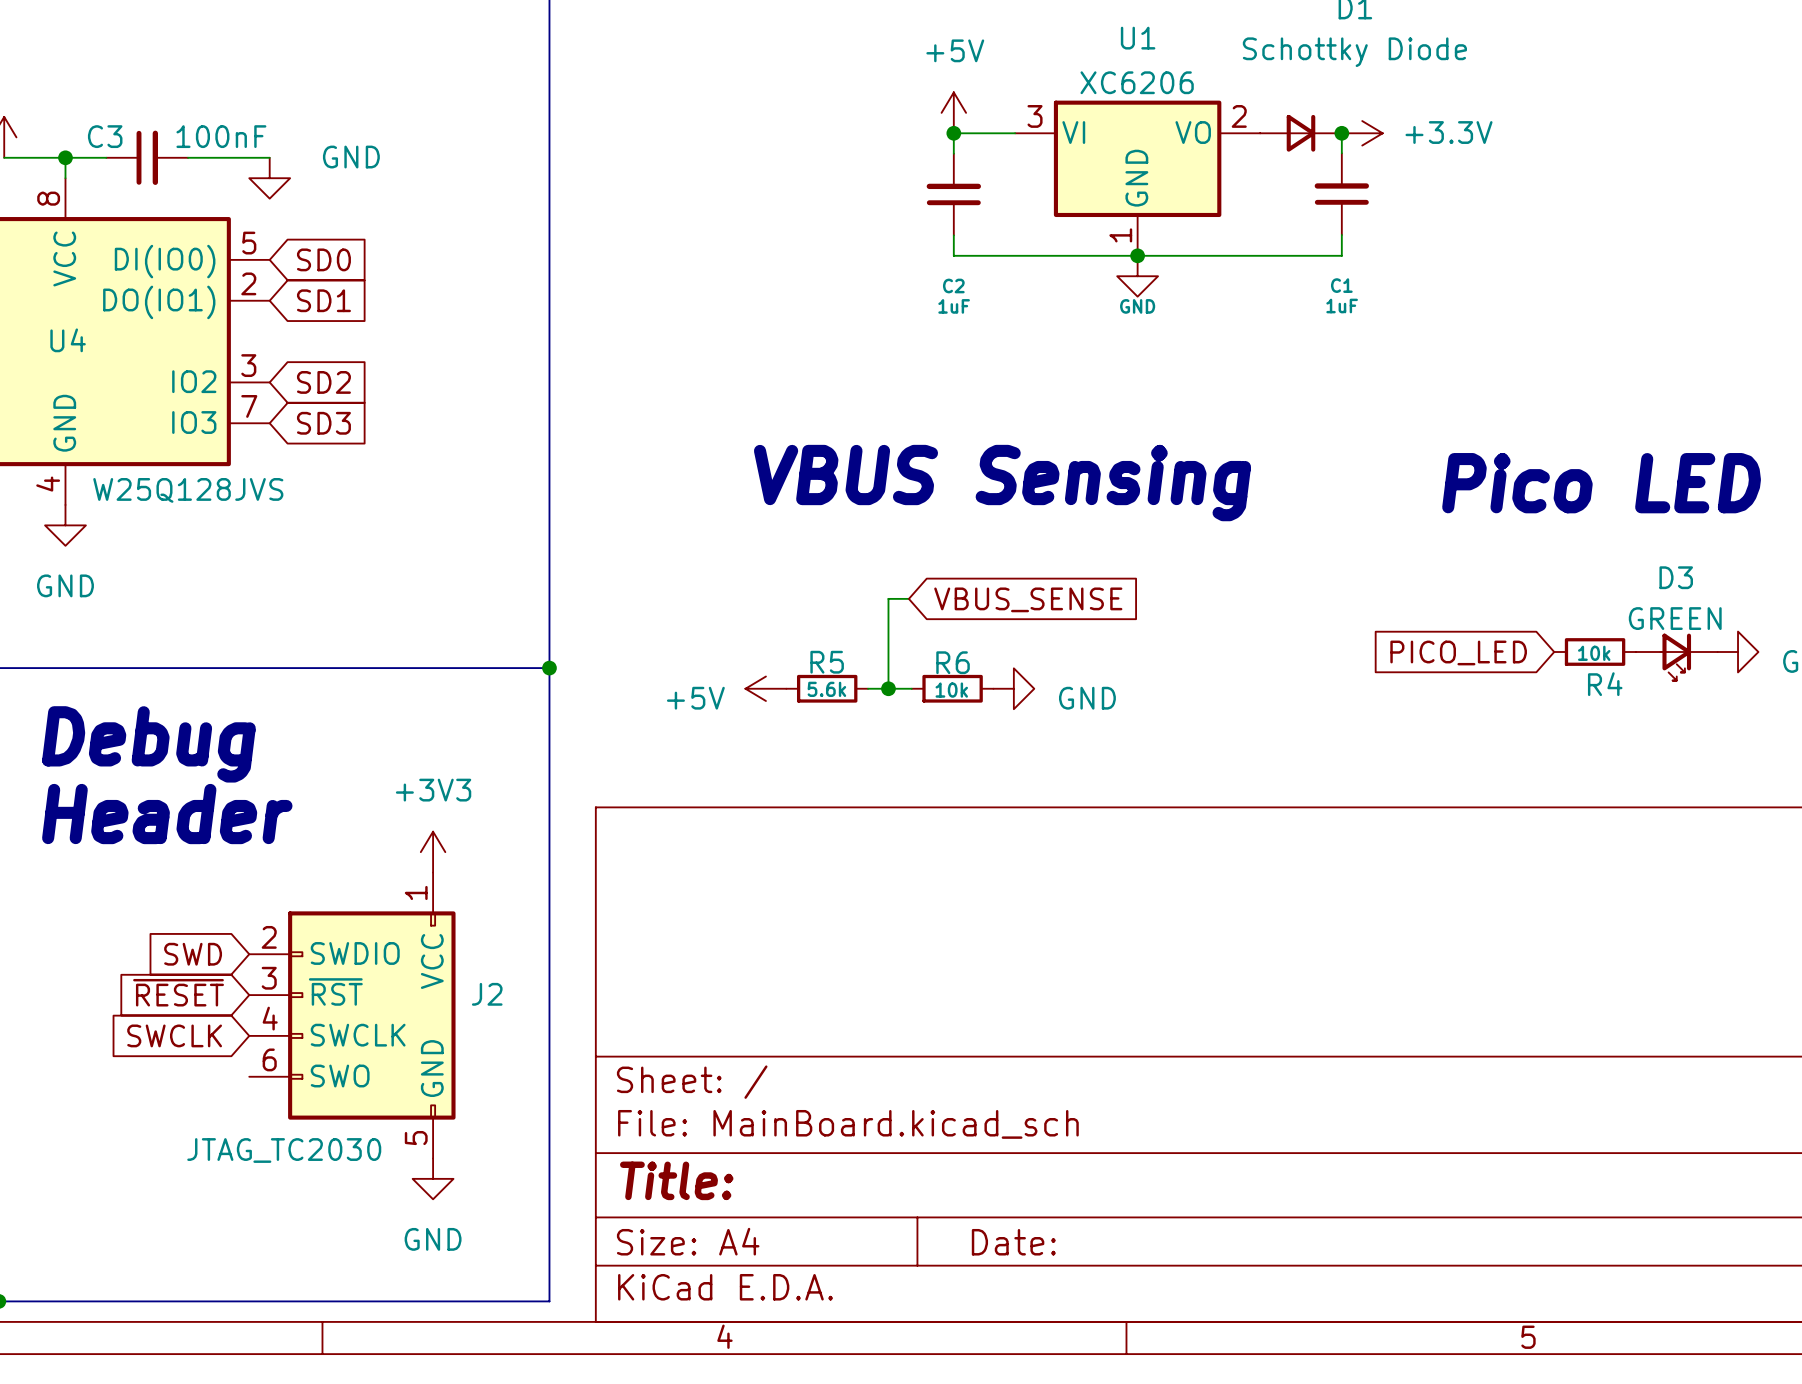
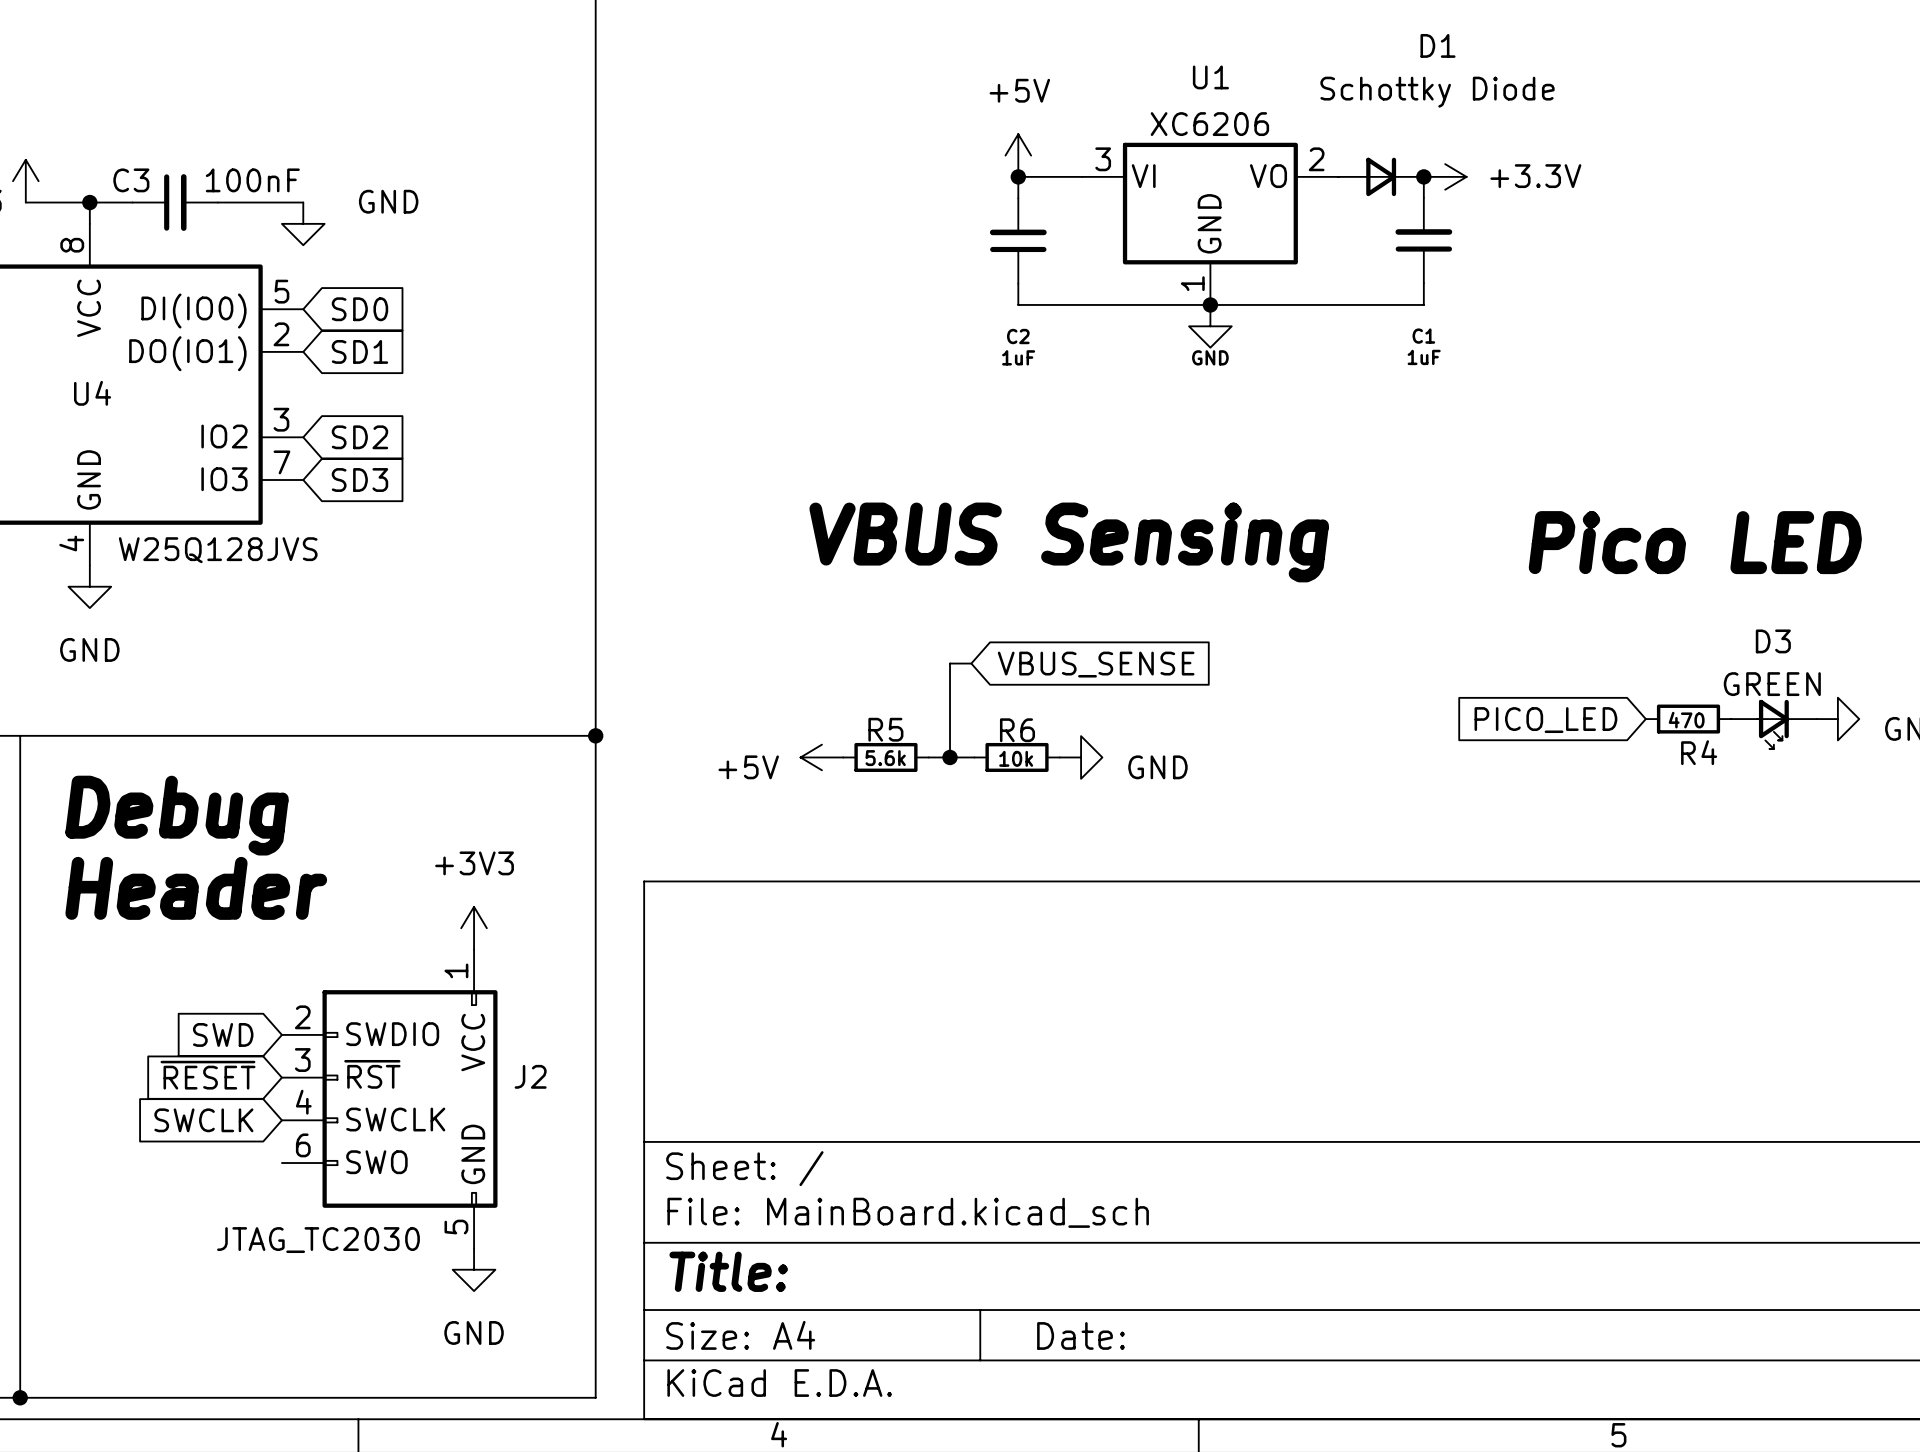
R4 value: 10k (1594, 653) -> 470 (1686, 720)

